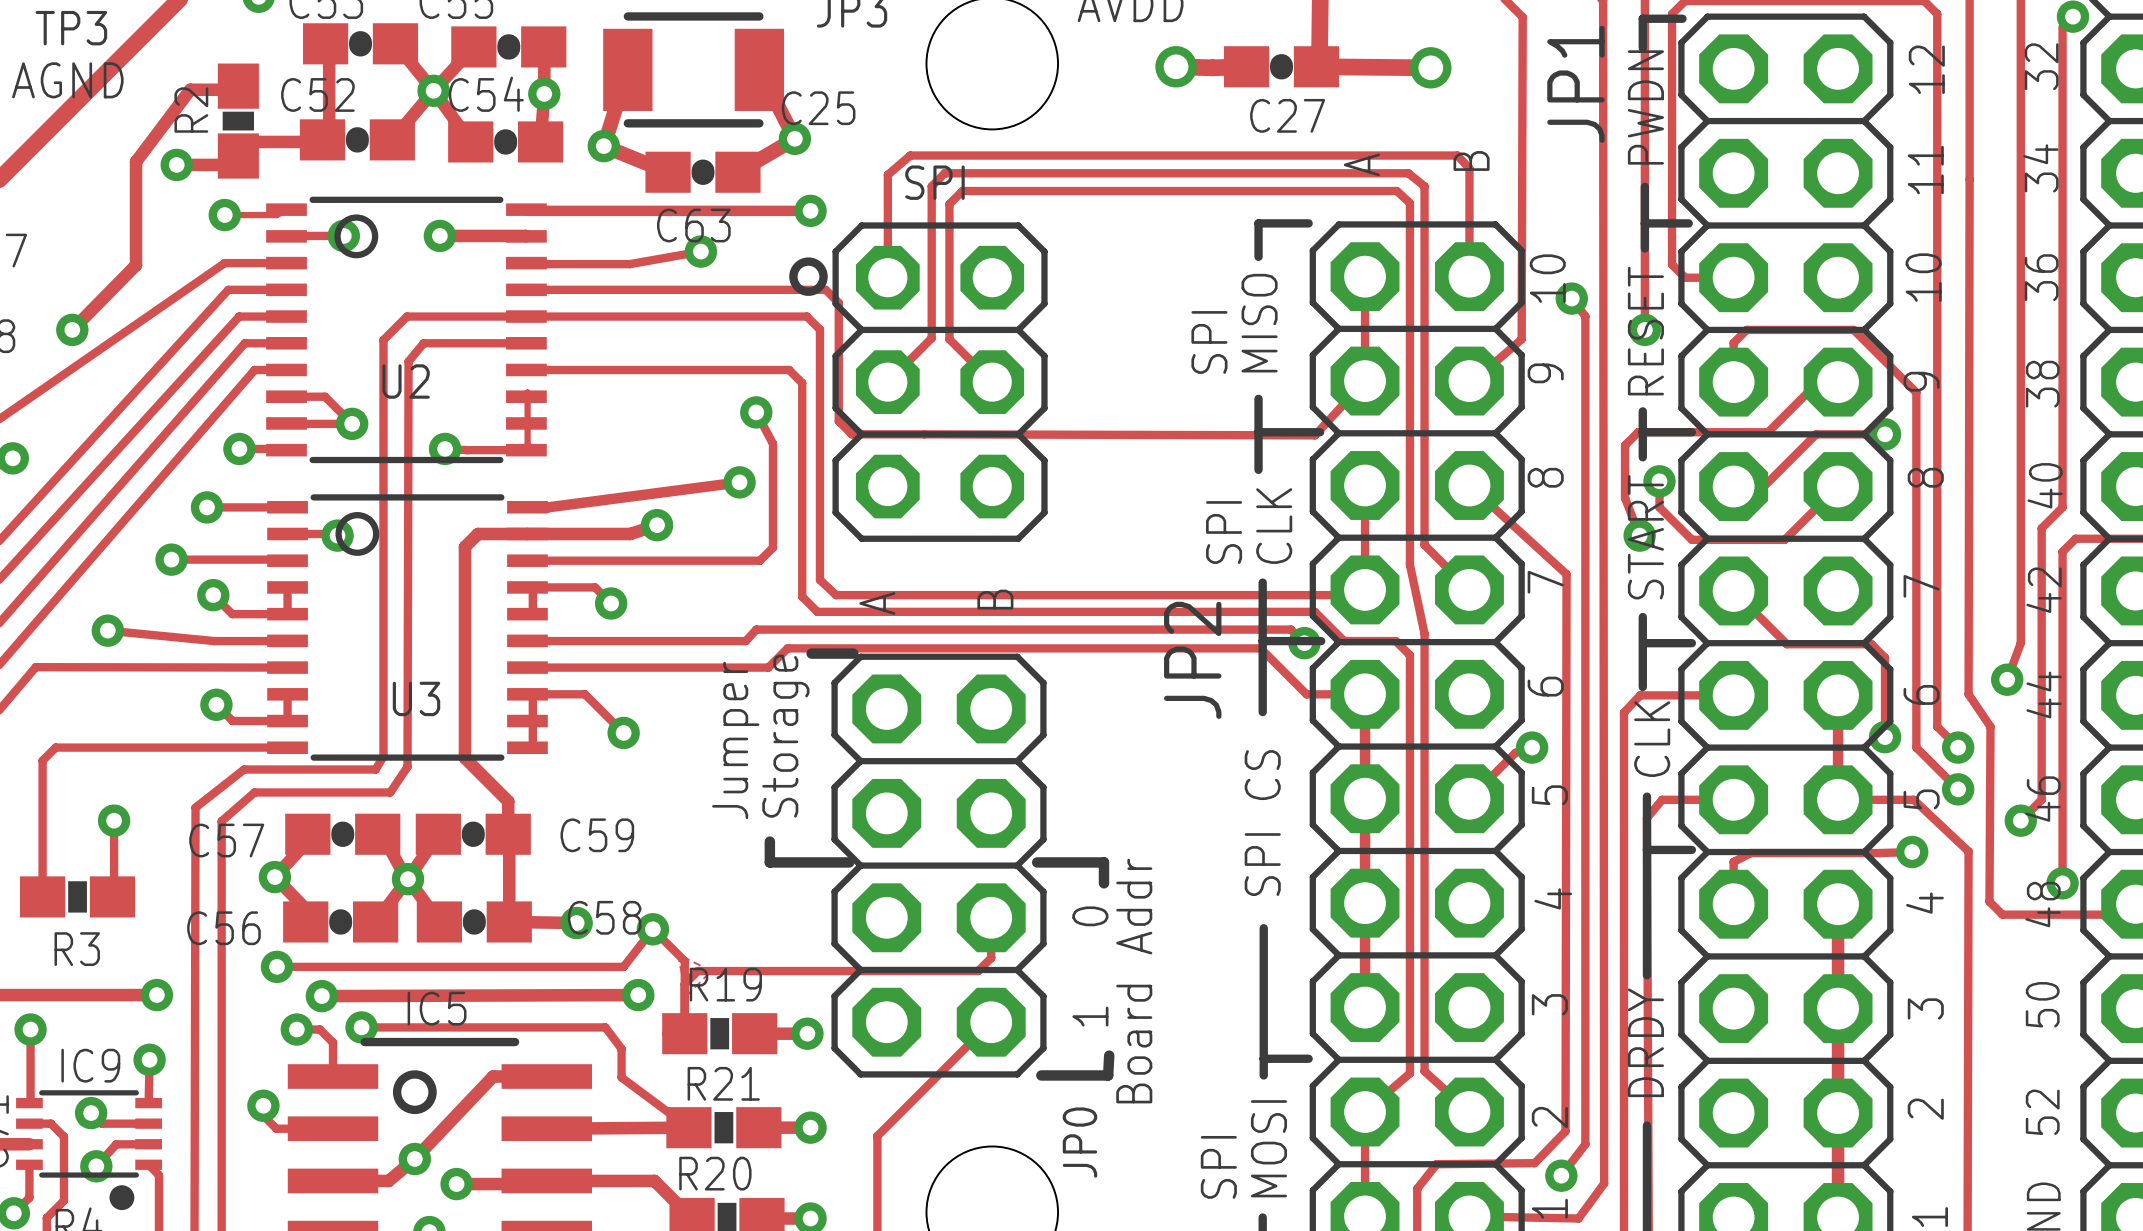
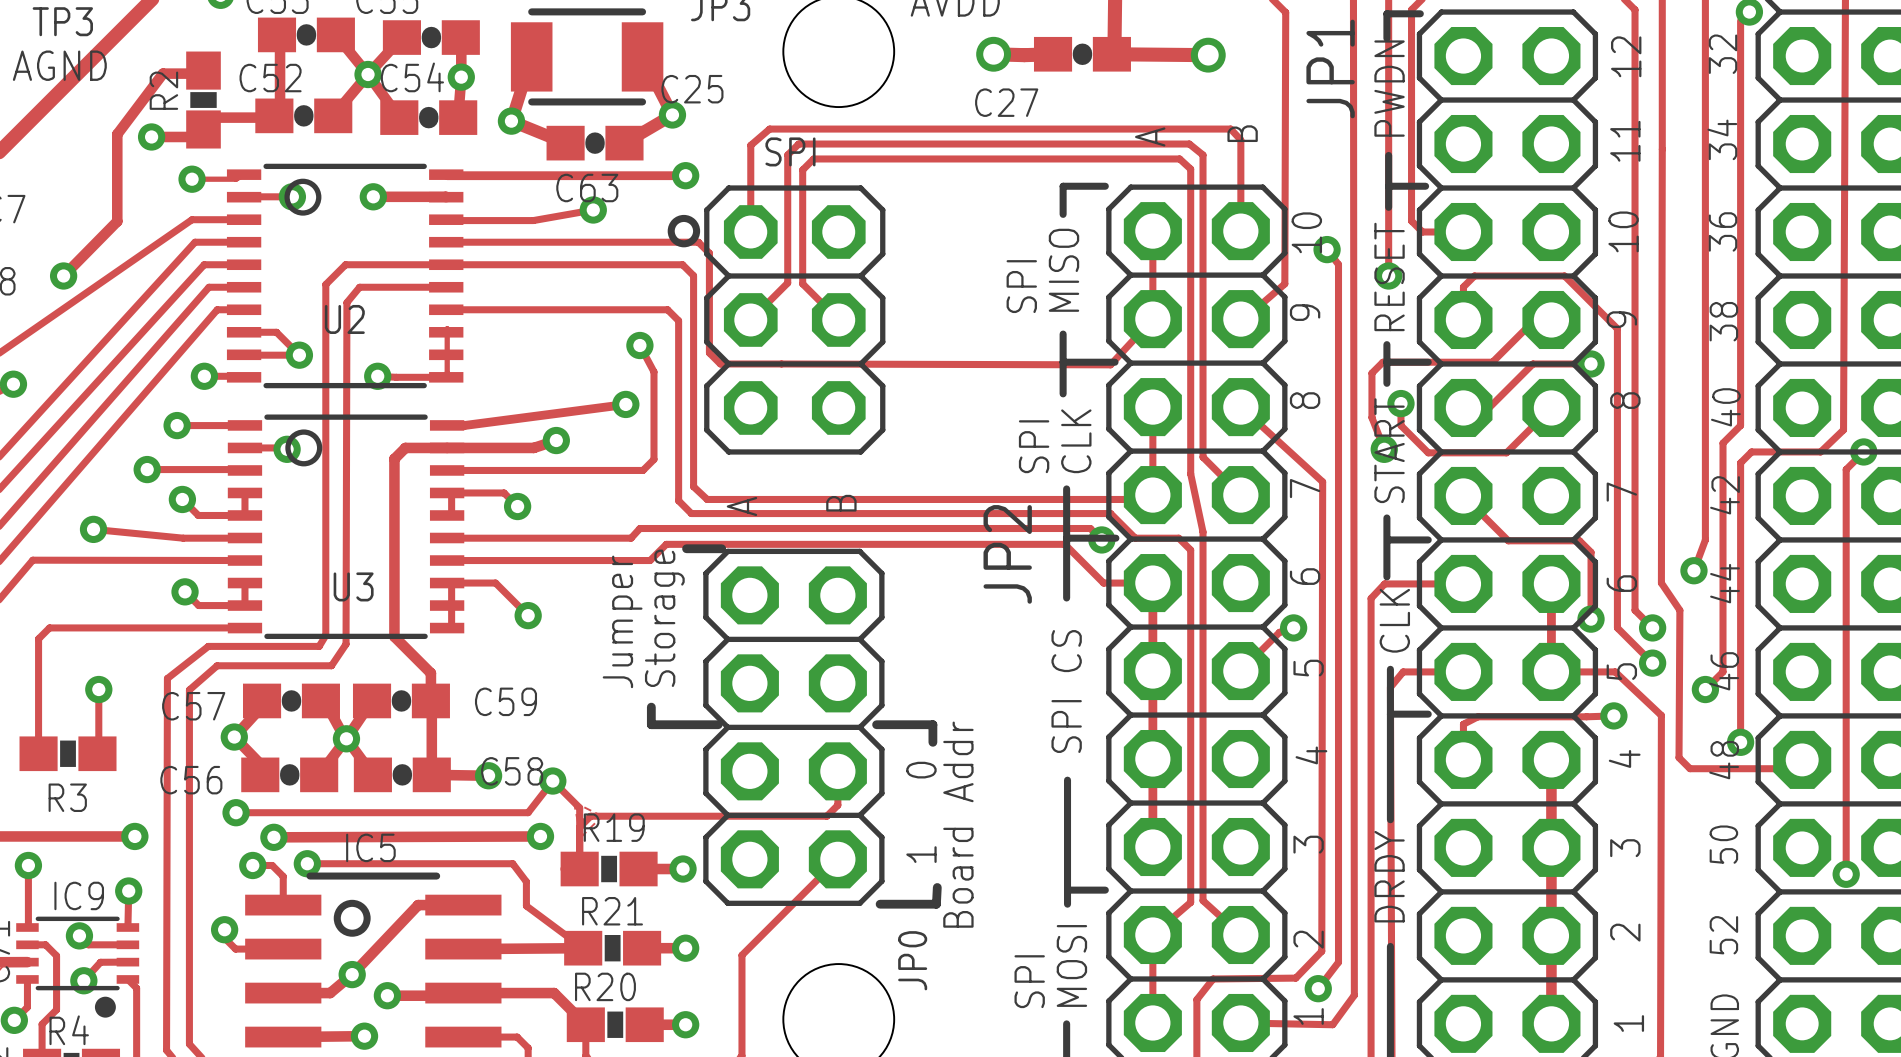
C27 name position: C27 (1287, 115) -> C27 (1006, 102)

